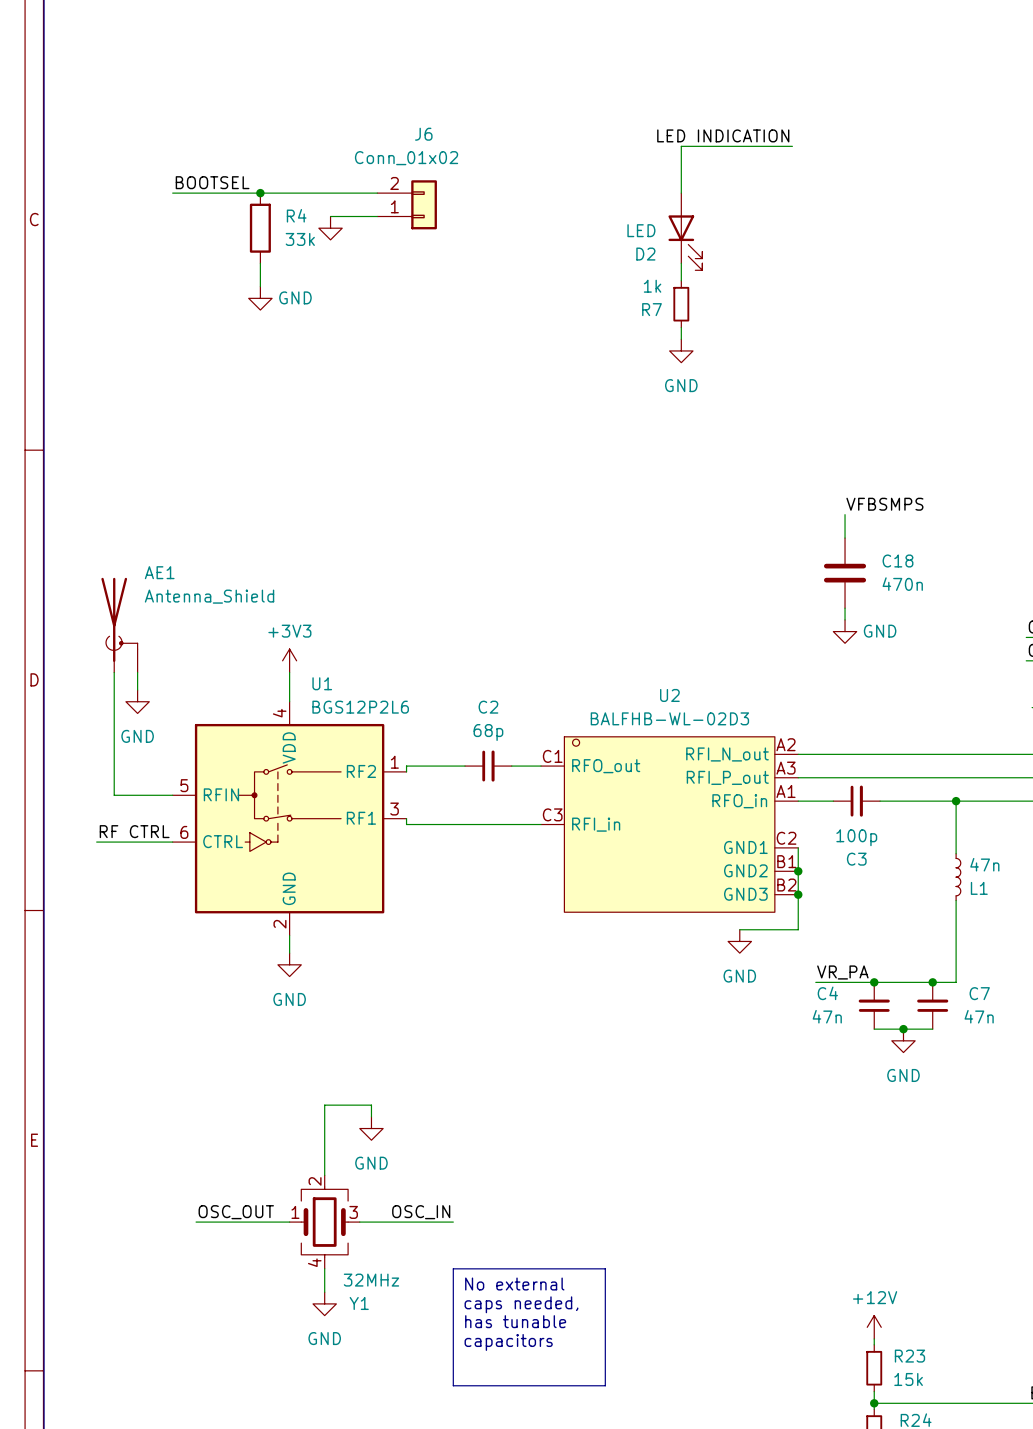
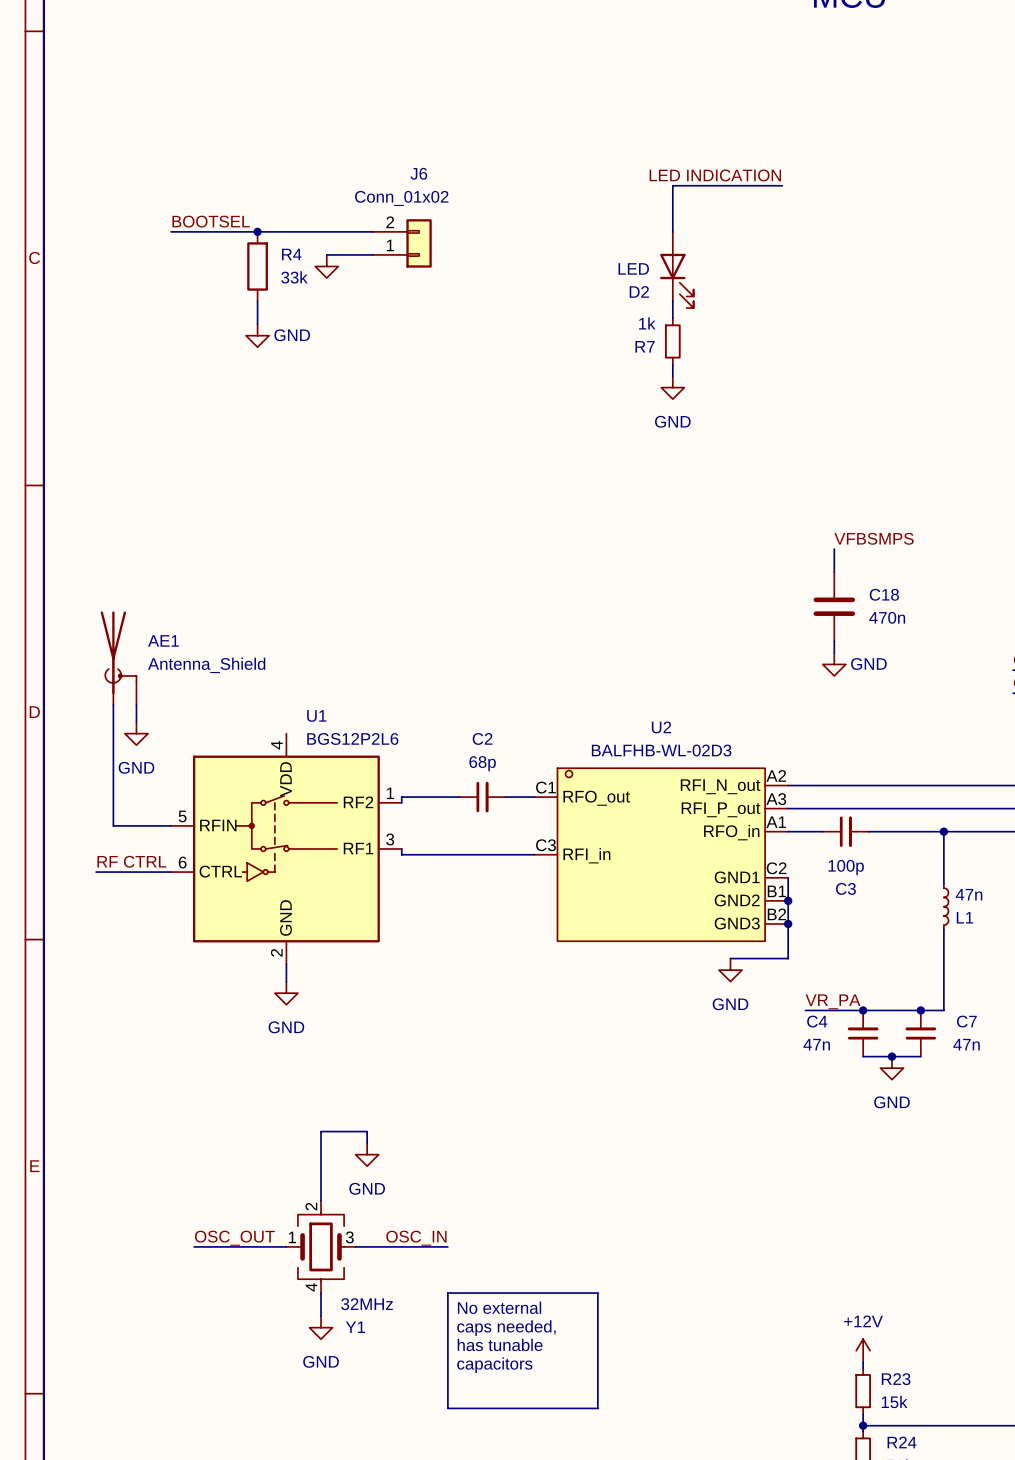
AE1 name position: AE1 (159, 572) -> AE1 (163, 640)
AE1 value position: Antenna_Shield (209, 596) -> Antenna_Shield (206, 665)
power symbol: +3V3 (289, 660) -> none
wire: (289, 672) (289, 701) -> none

